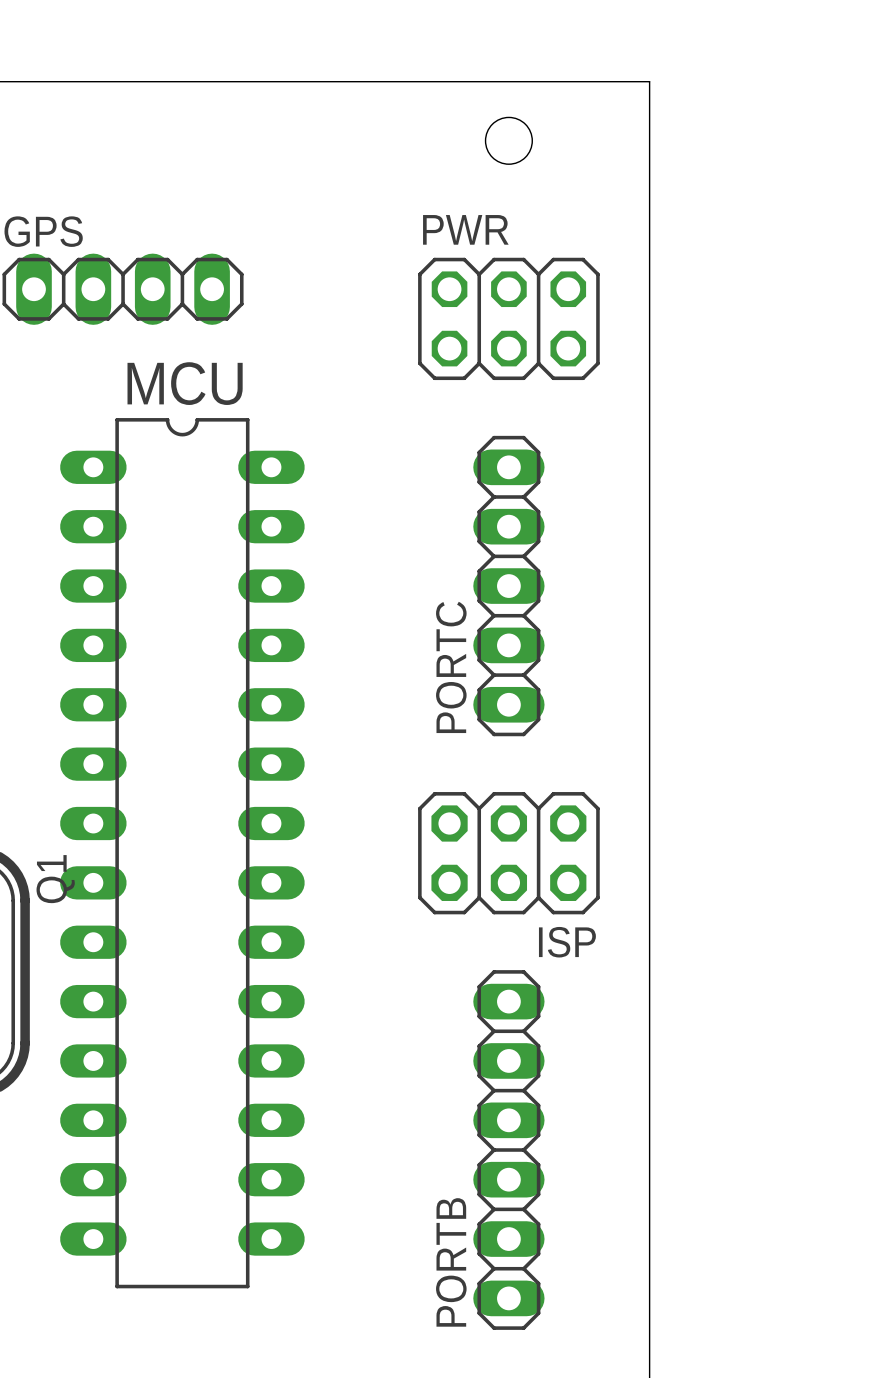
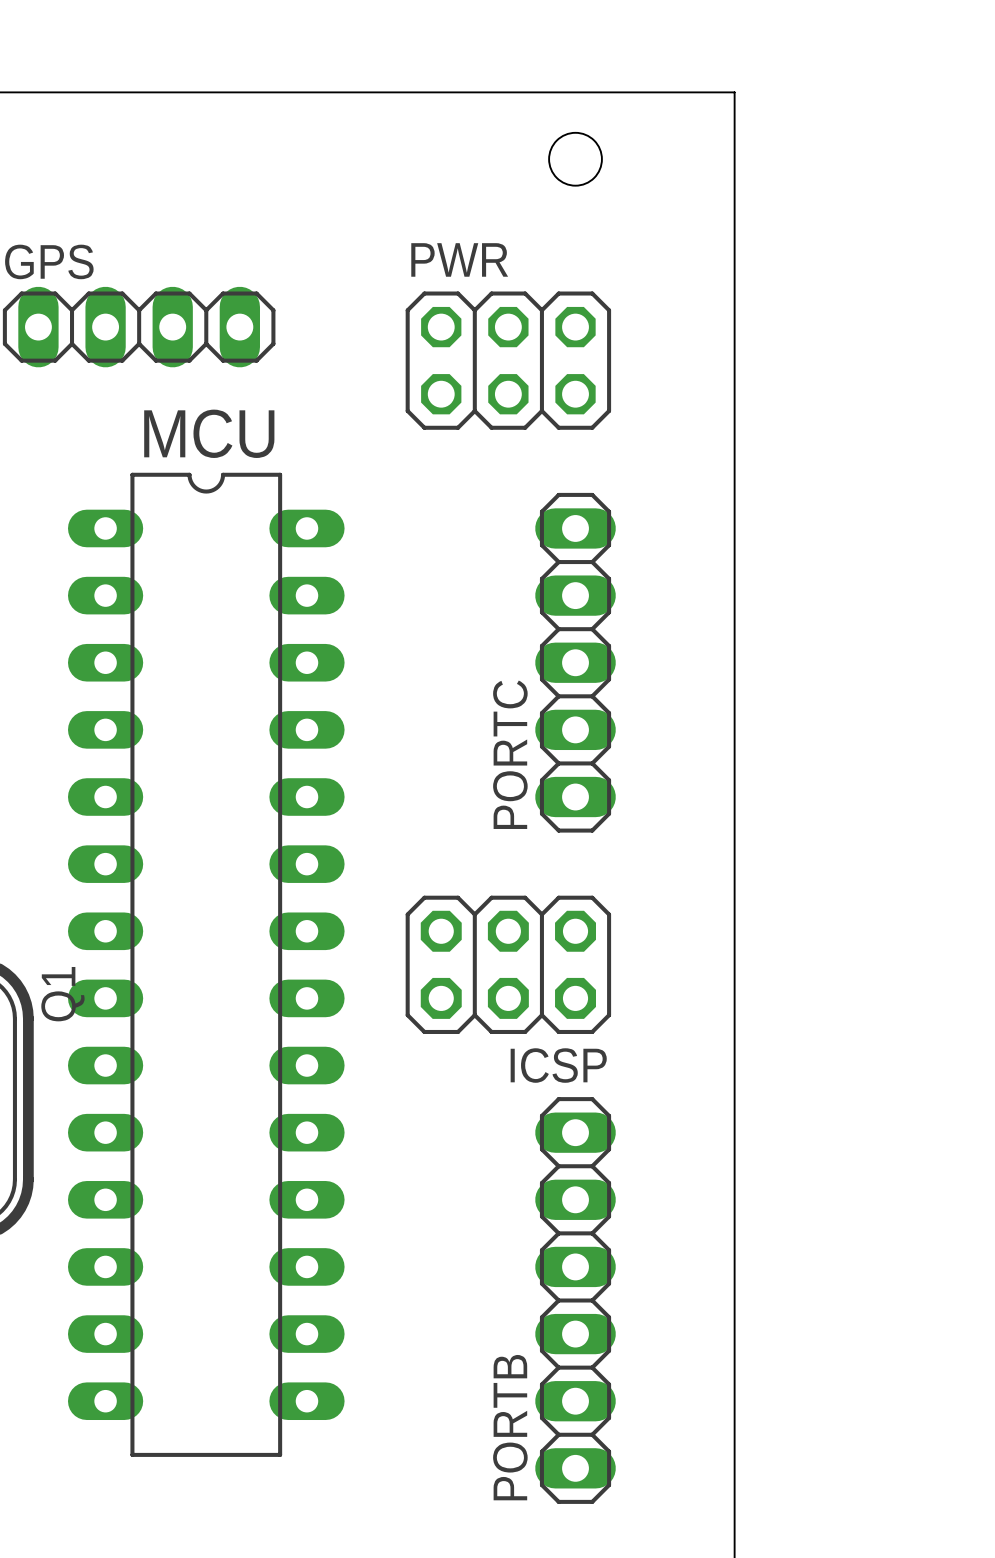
PWR position: (508, 318) -> (508, 360)
ICSP: none -> (508, 964)
ISP: (508, 853) -> none

